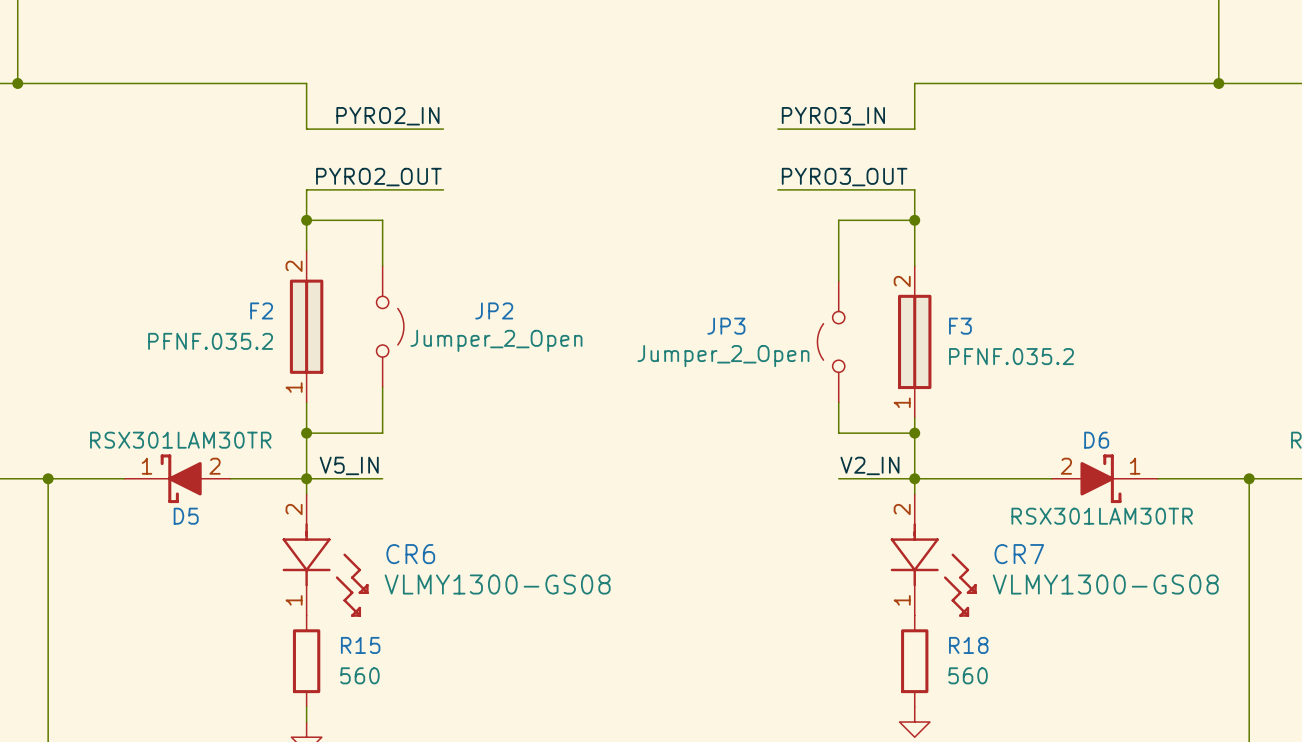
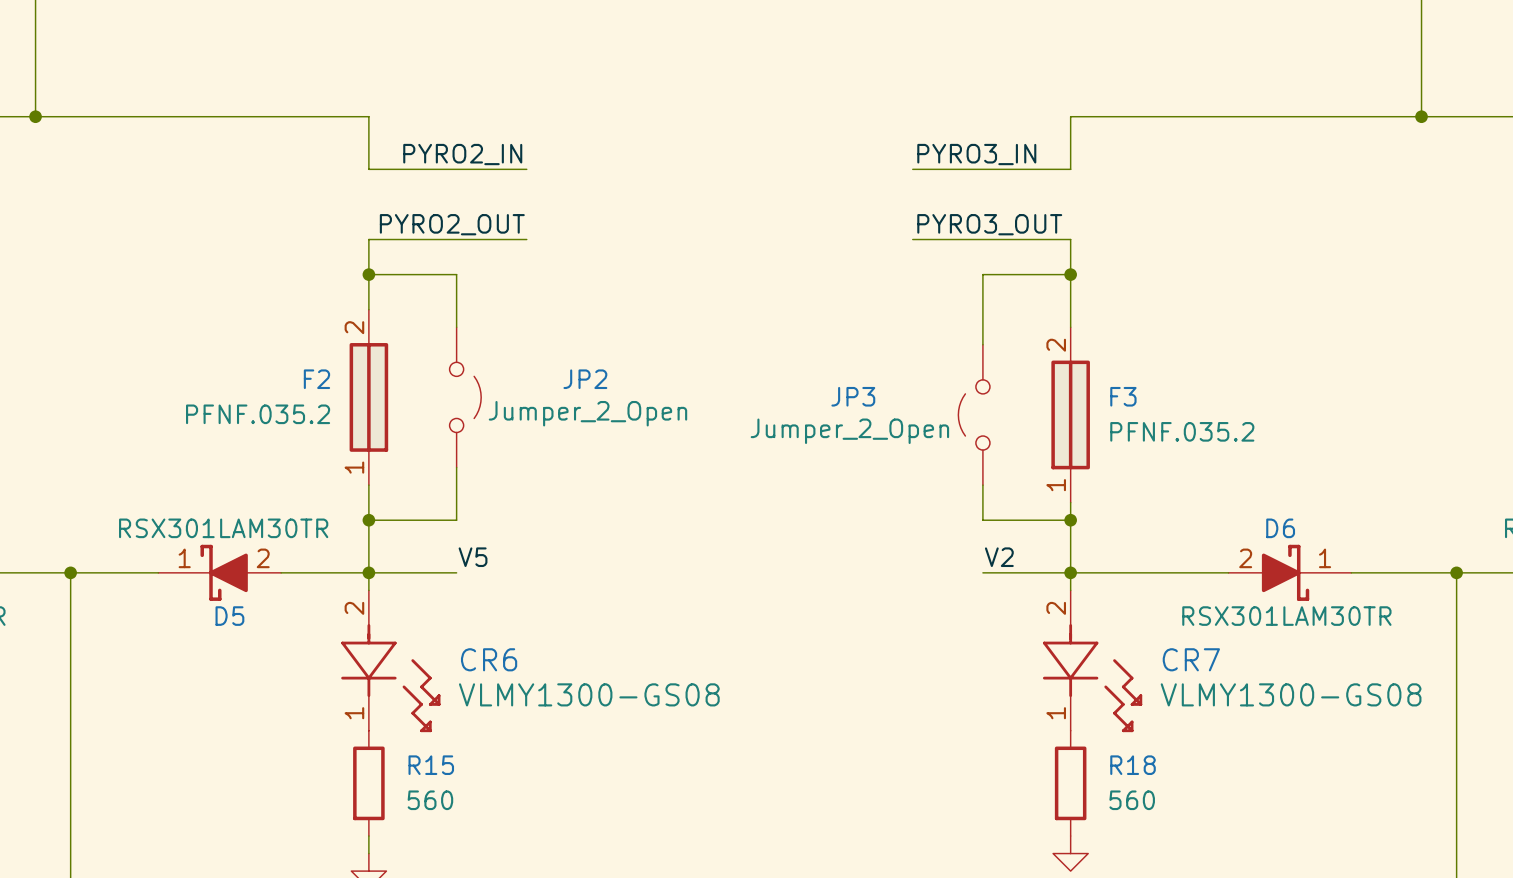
label: V5_IN (349, 465) -> V5 (473, 557)
label: V2_IN (869, 465) -> V2 (999, 557)

